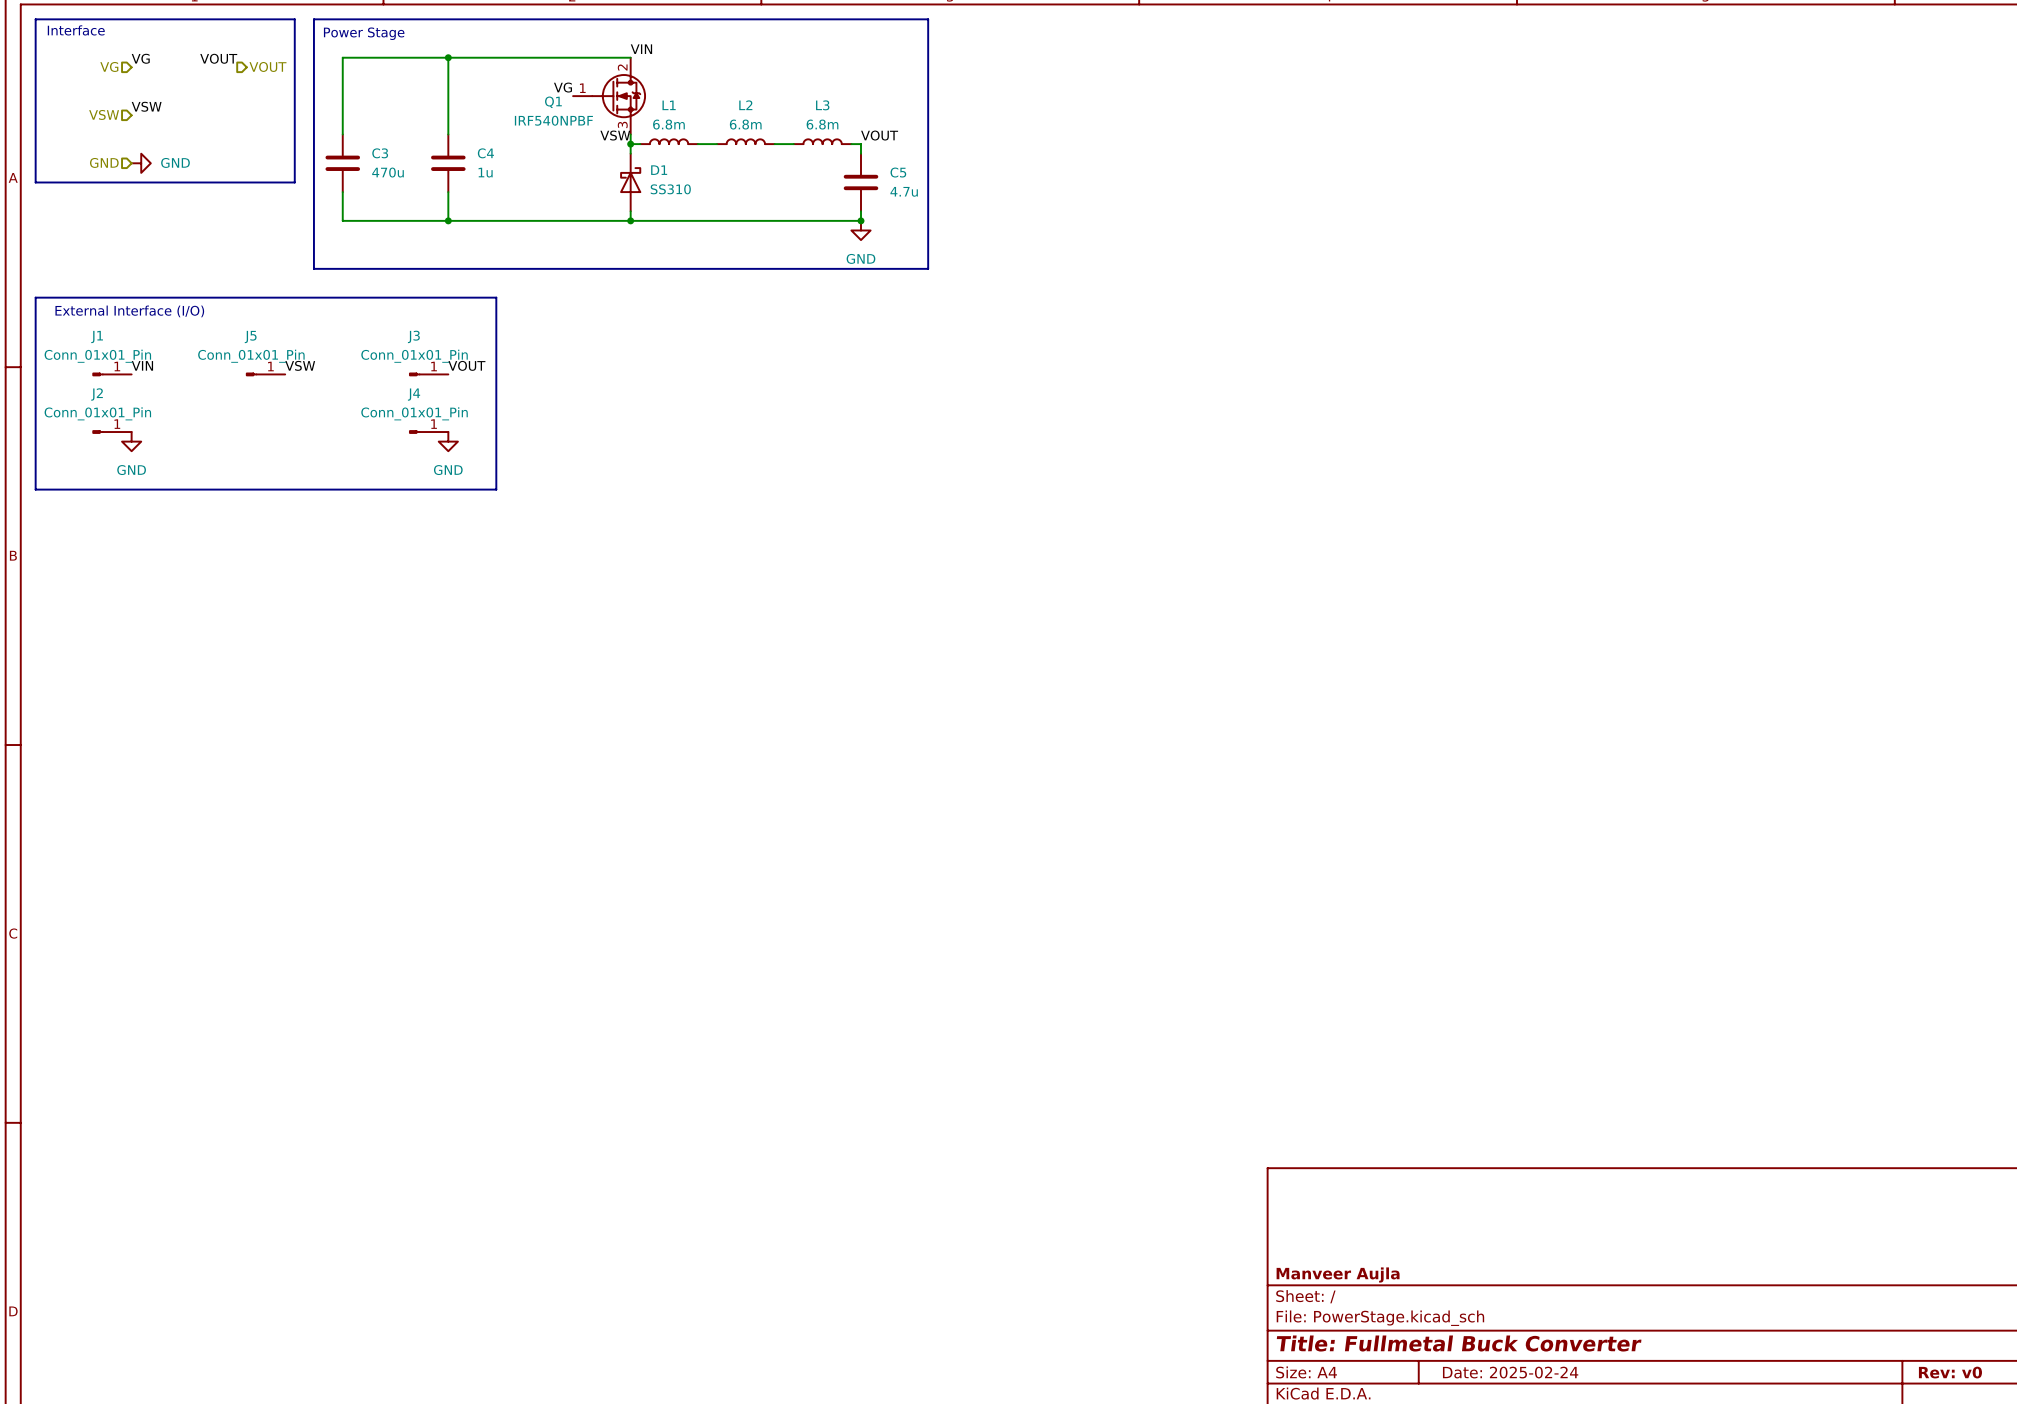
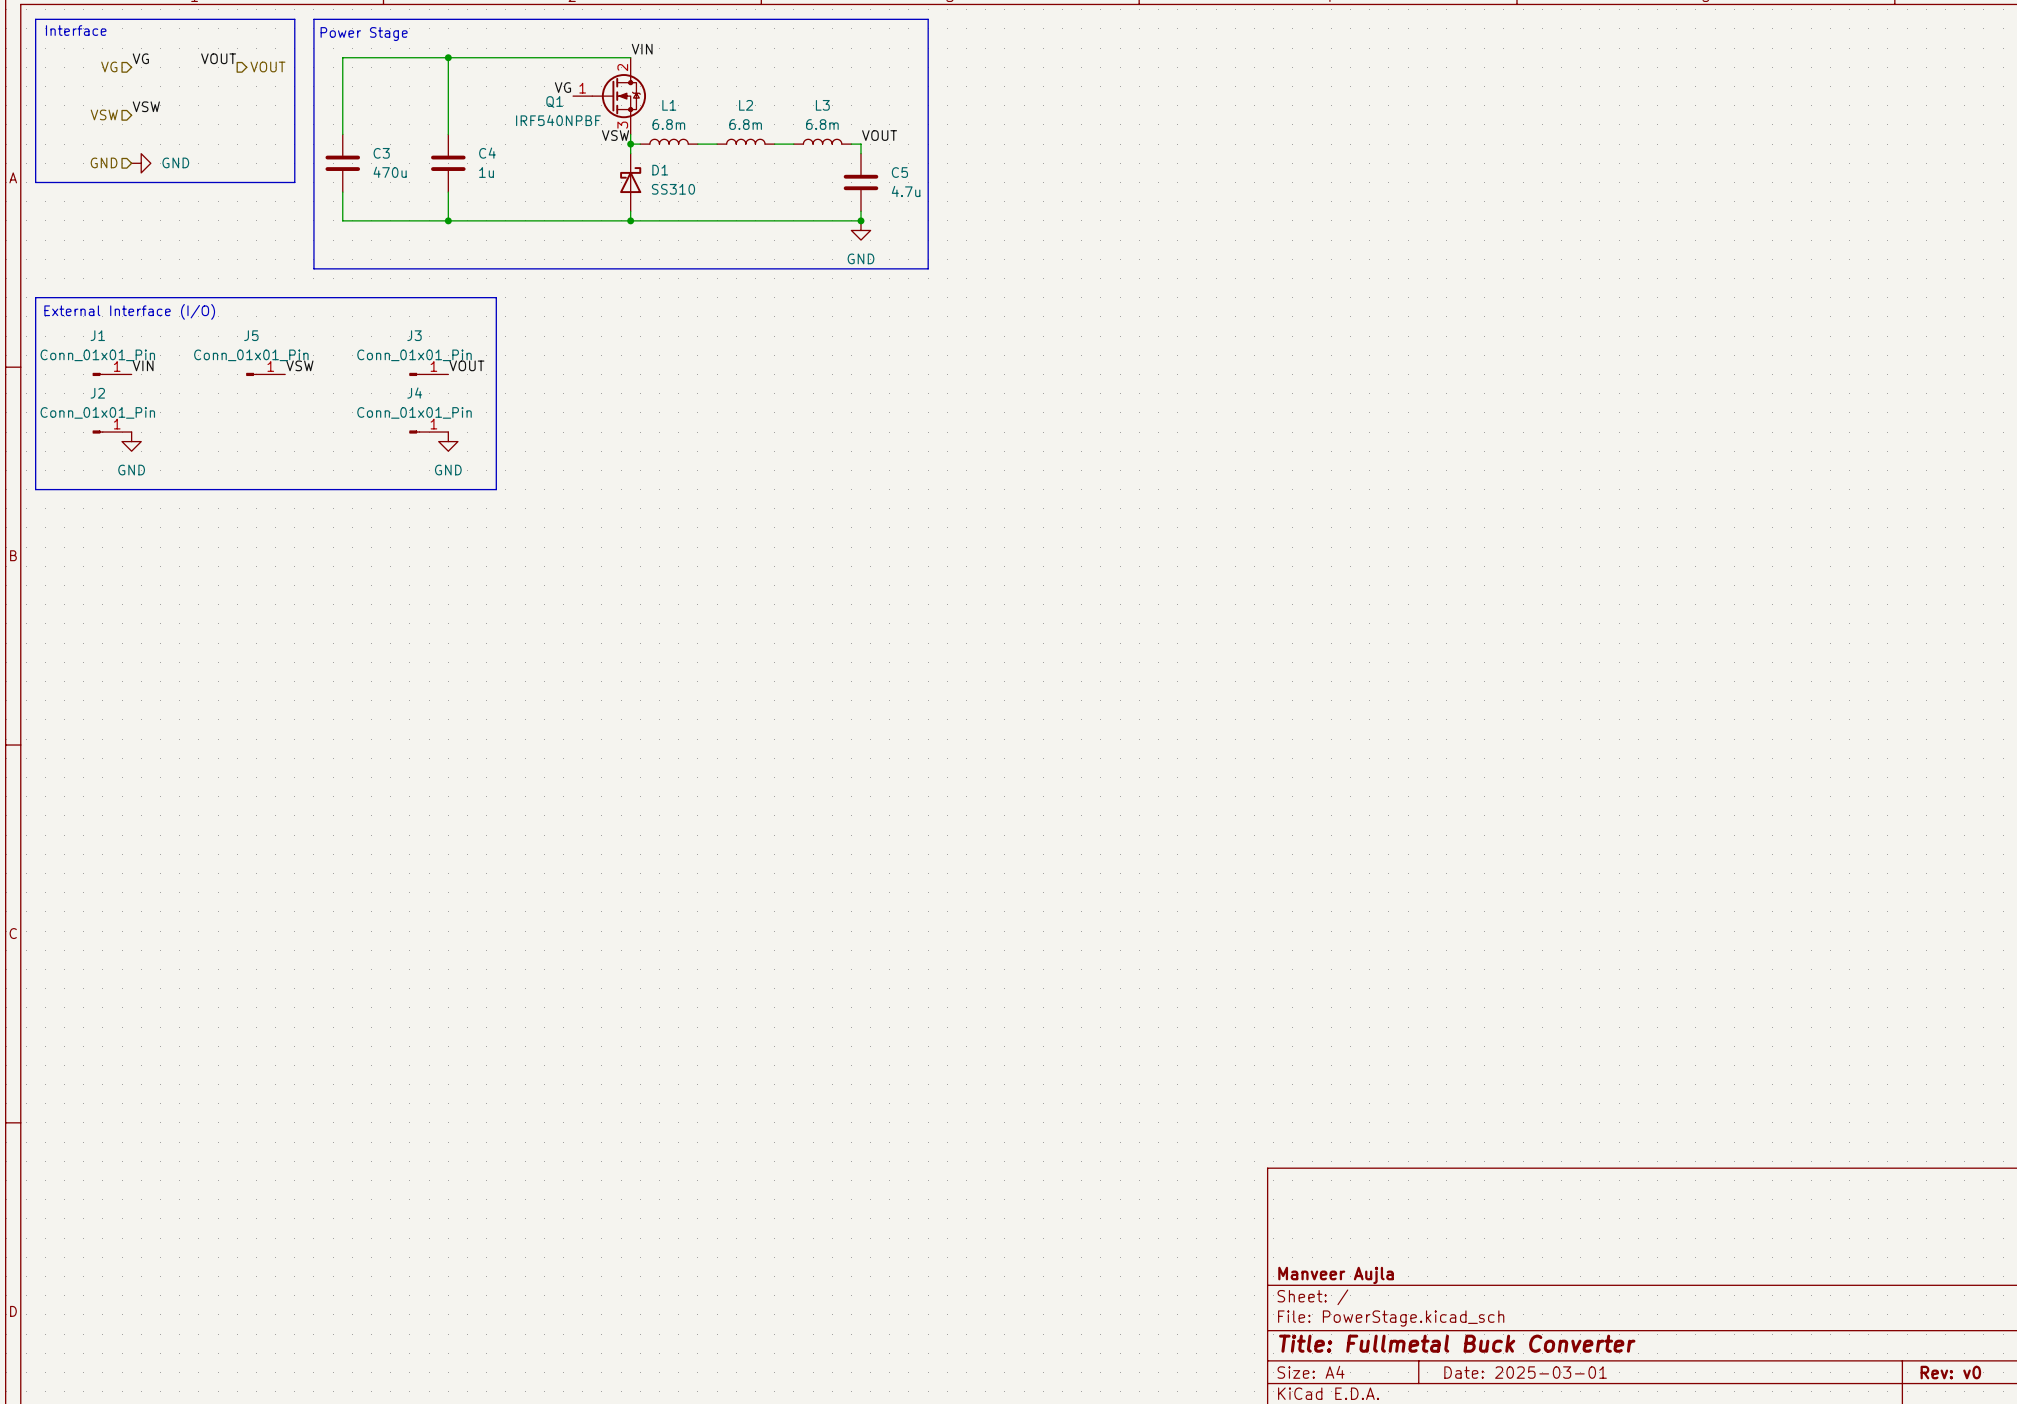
title block: Date: 2025-02-24 (1510, 1372) -> Date: 2025-03-01 (1525, 1372)

